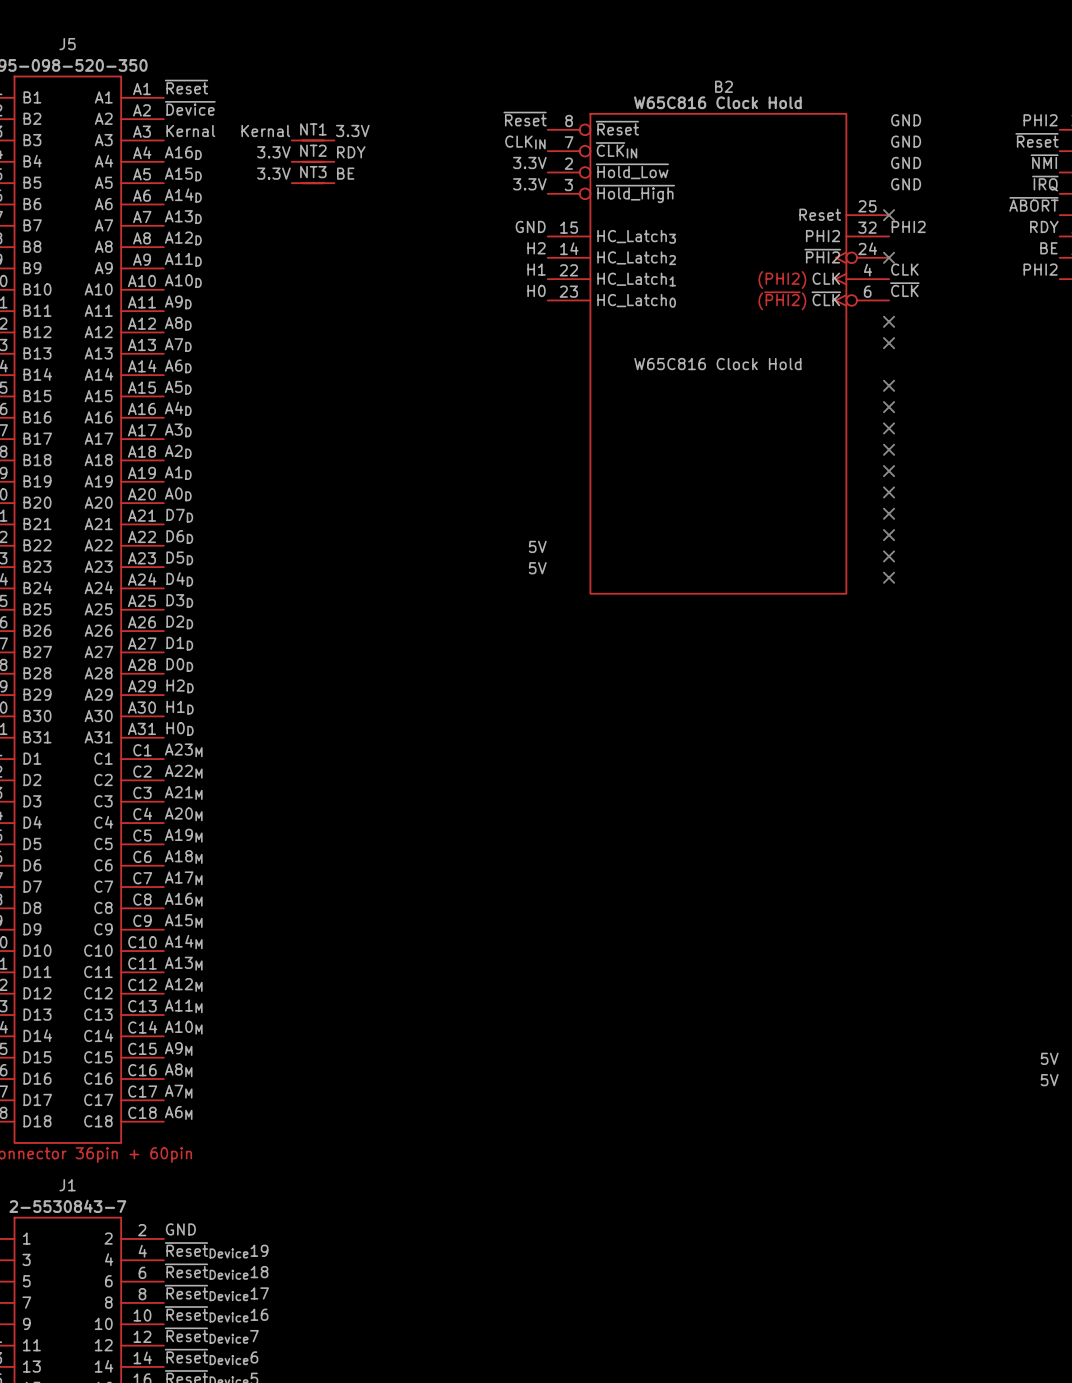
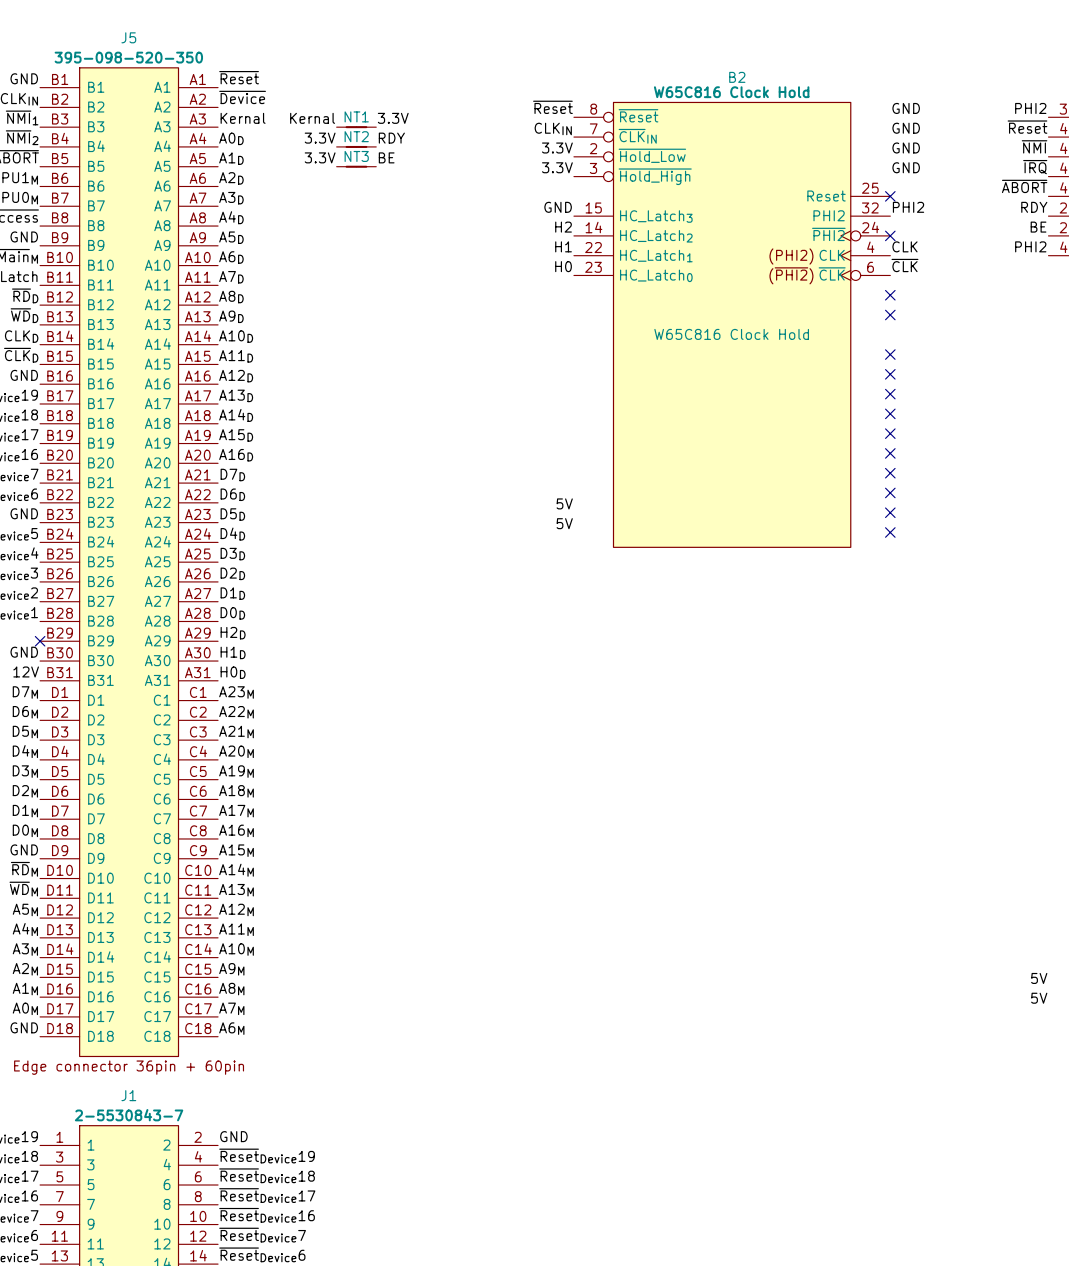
label: A16D (183, 153) -> A0D (231, 138)
label: A15D (183, 174) -> A1D (231, 158)
label: A14D (183, 195) -> A2D (231, 178)
label: A13D (183, 217) -> A3D (231, 198)
label: A12D (183, 238) -> A4D (231, 217)
label: A11D (183, 259) -> A5D (231, 237)
label: A10D (183, 281) -> A6D (231, 257)
label: A9D (178, 302) -> A7D (231, 277)
label: A7D (178, 345) -> A9D (231, 316)
label: A6D (178, 366) -> A10D (236, 336)
label: A5D (178, 387) -> A11D (236, 356)
label: A4D (178, 408) -> A12D (236, 376)
label: A3D (178, 430) -> A13D (236, 395)
label: A2D (178, 451) -> A14D (236, 415)
label: A1D (178, 473) -> A15D (236, 435)
label: A0D (178, 494) -> A16D (236, 455)

